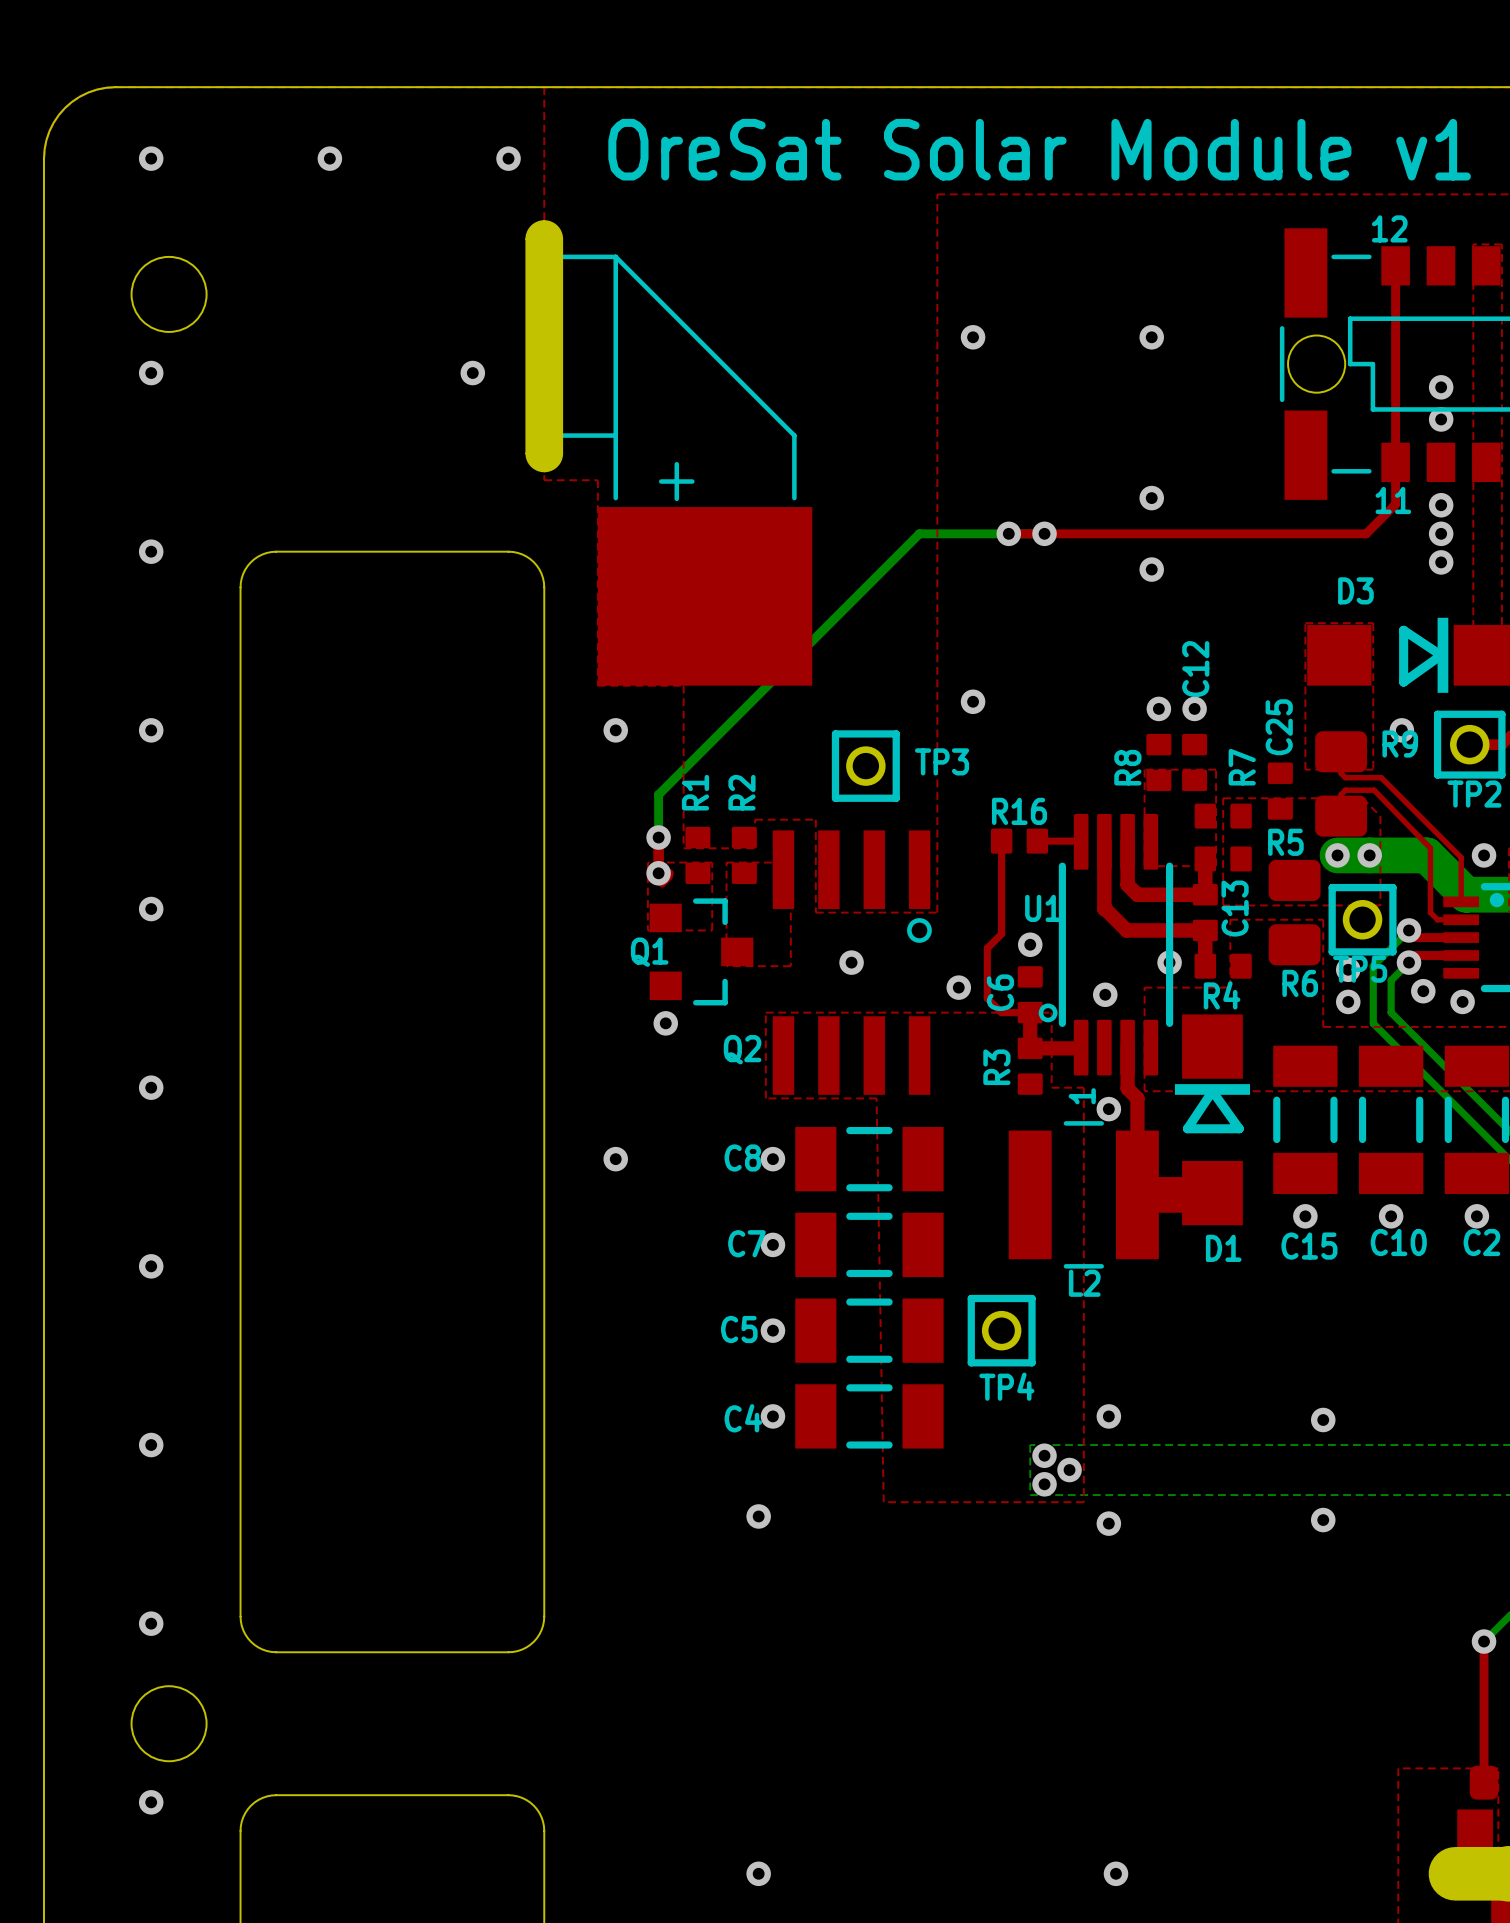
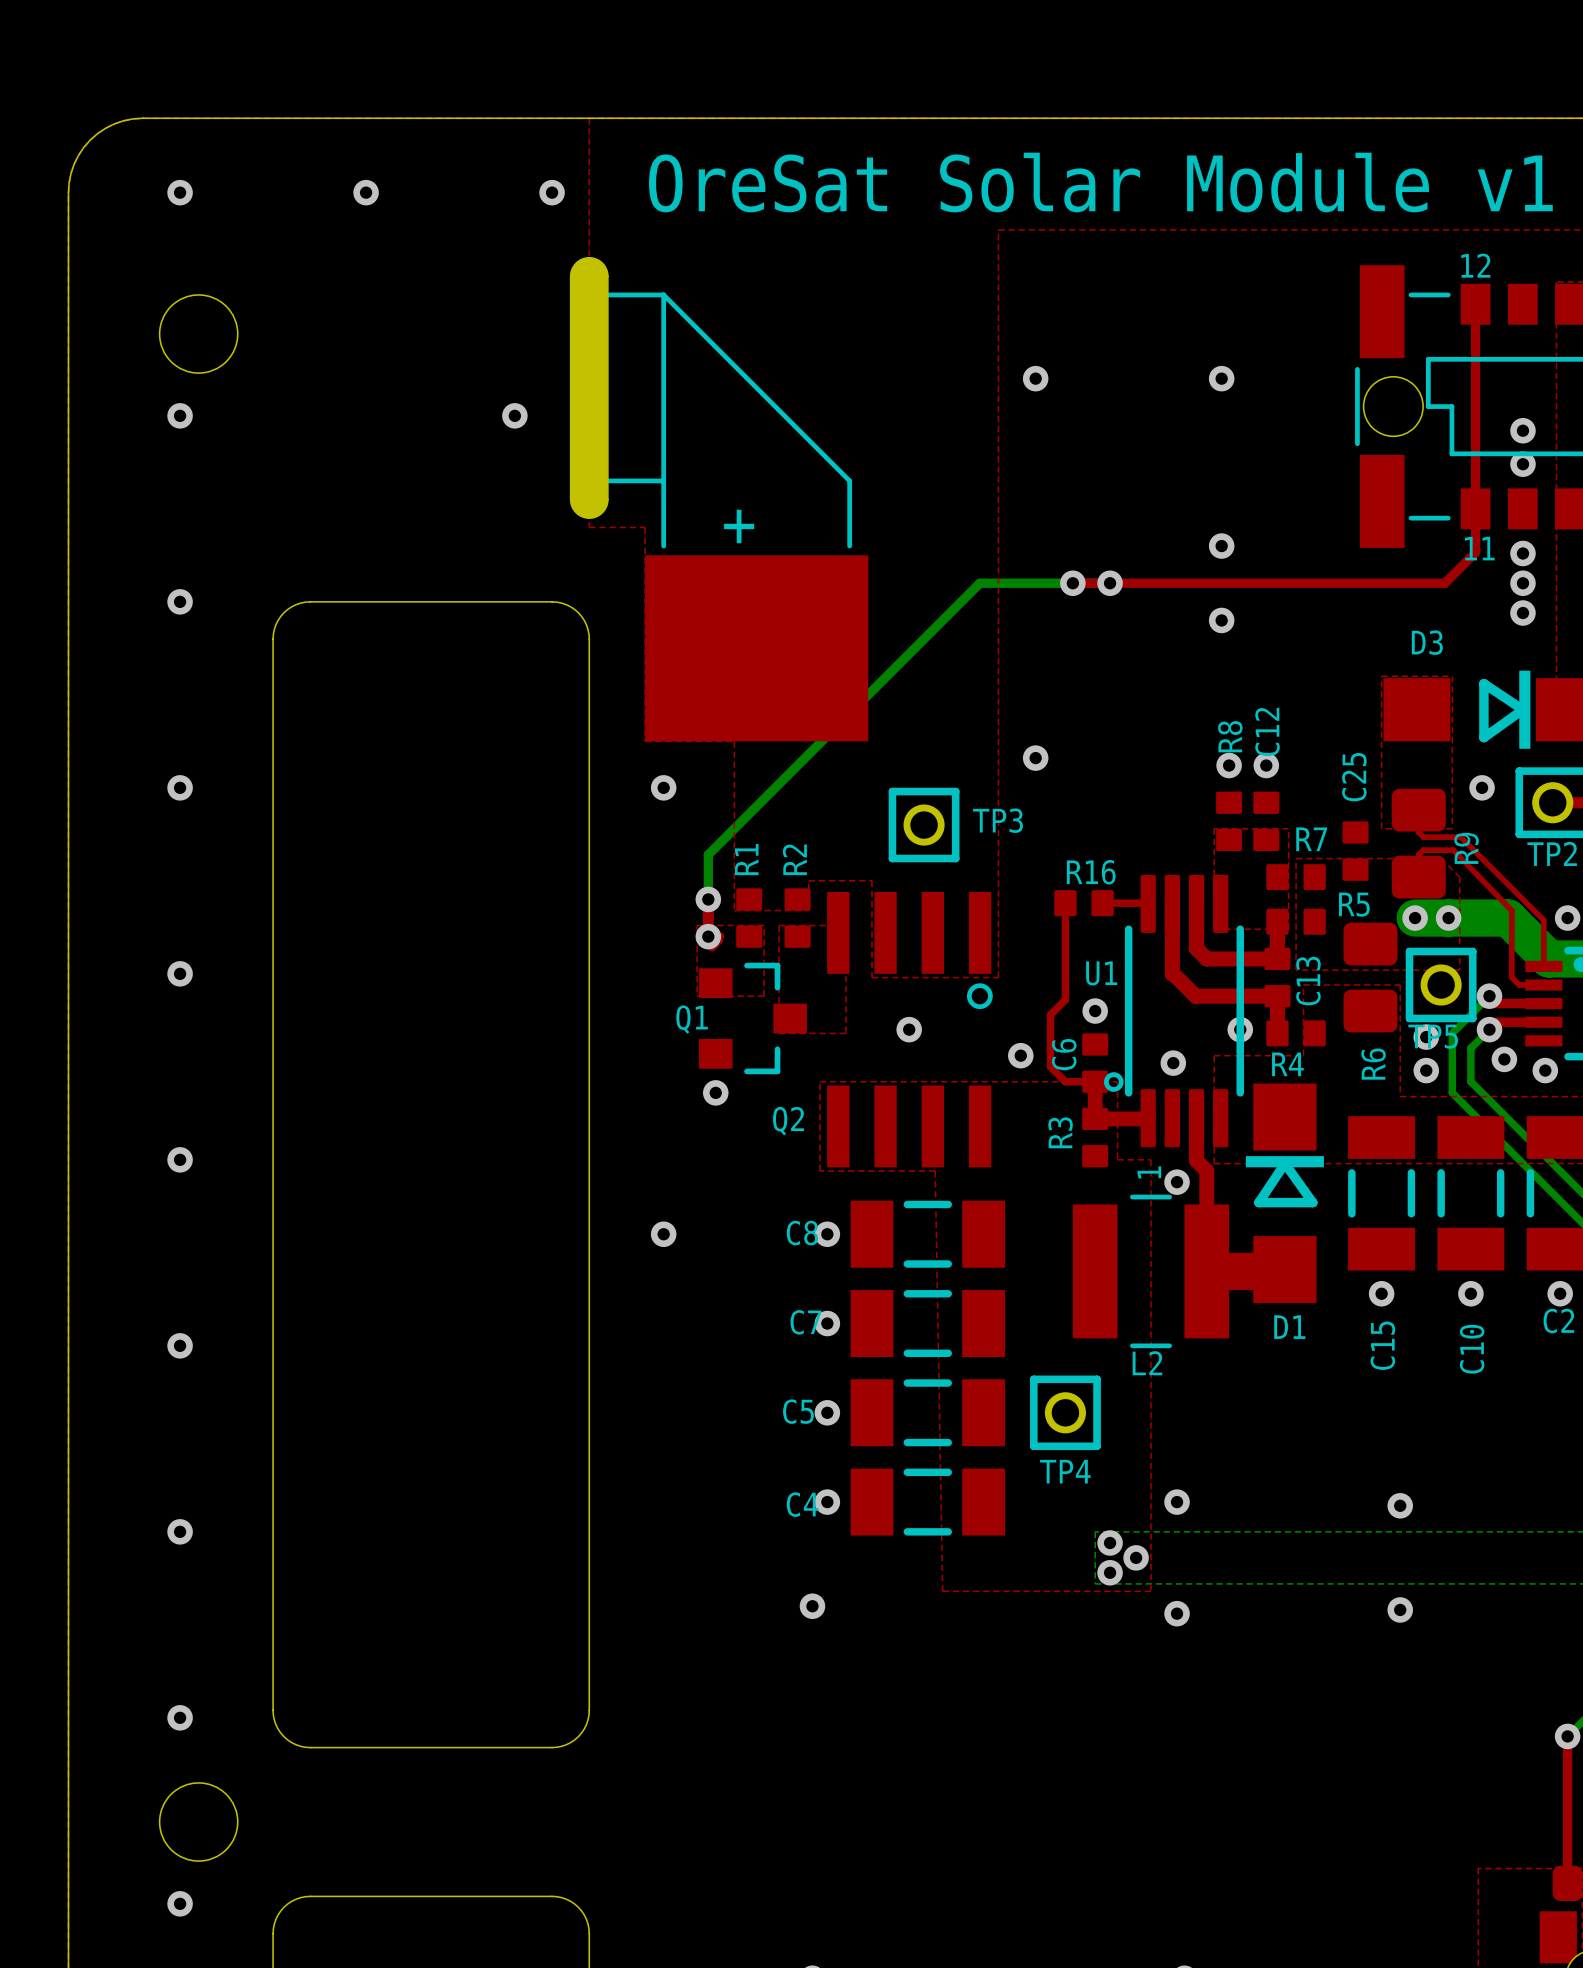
R9 name rotation: 0° (1400, 744) -> 90° counterclockwise (1466, 848)
R8 name position: R8 (1127, 767) -> R8 (1230, 736)
R7 name rotation: 0° (1242, 767) -> 90° clockwise (1311, 839)
R6 name rotation: 0° (1300, 983) -> 90° counterclockwise (1373, 1064)
C10 name rotation: 0° (1398, 1242) -> 90° counterclockwise (1472, 1349)
C15 name rotation: 0° (1309, 1246) -> 90° counterclockwise (1382, 1345)

